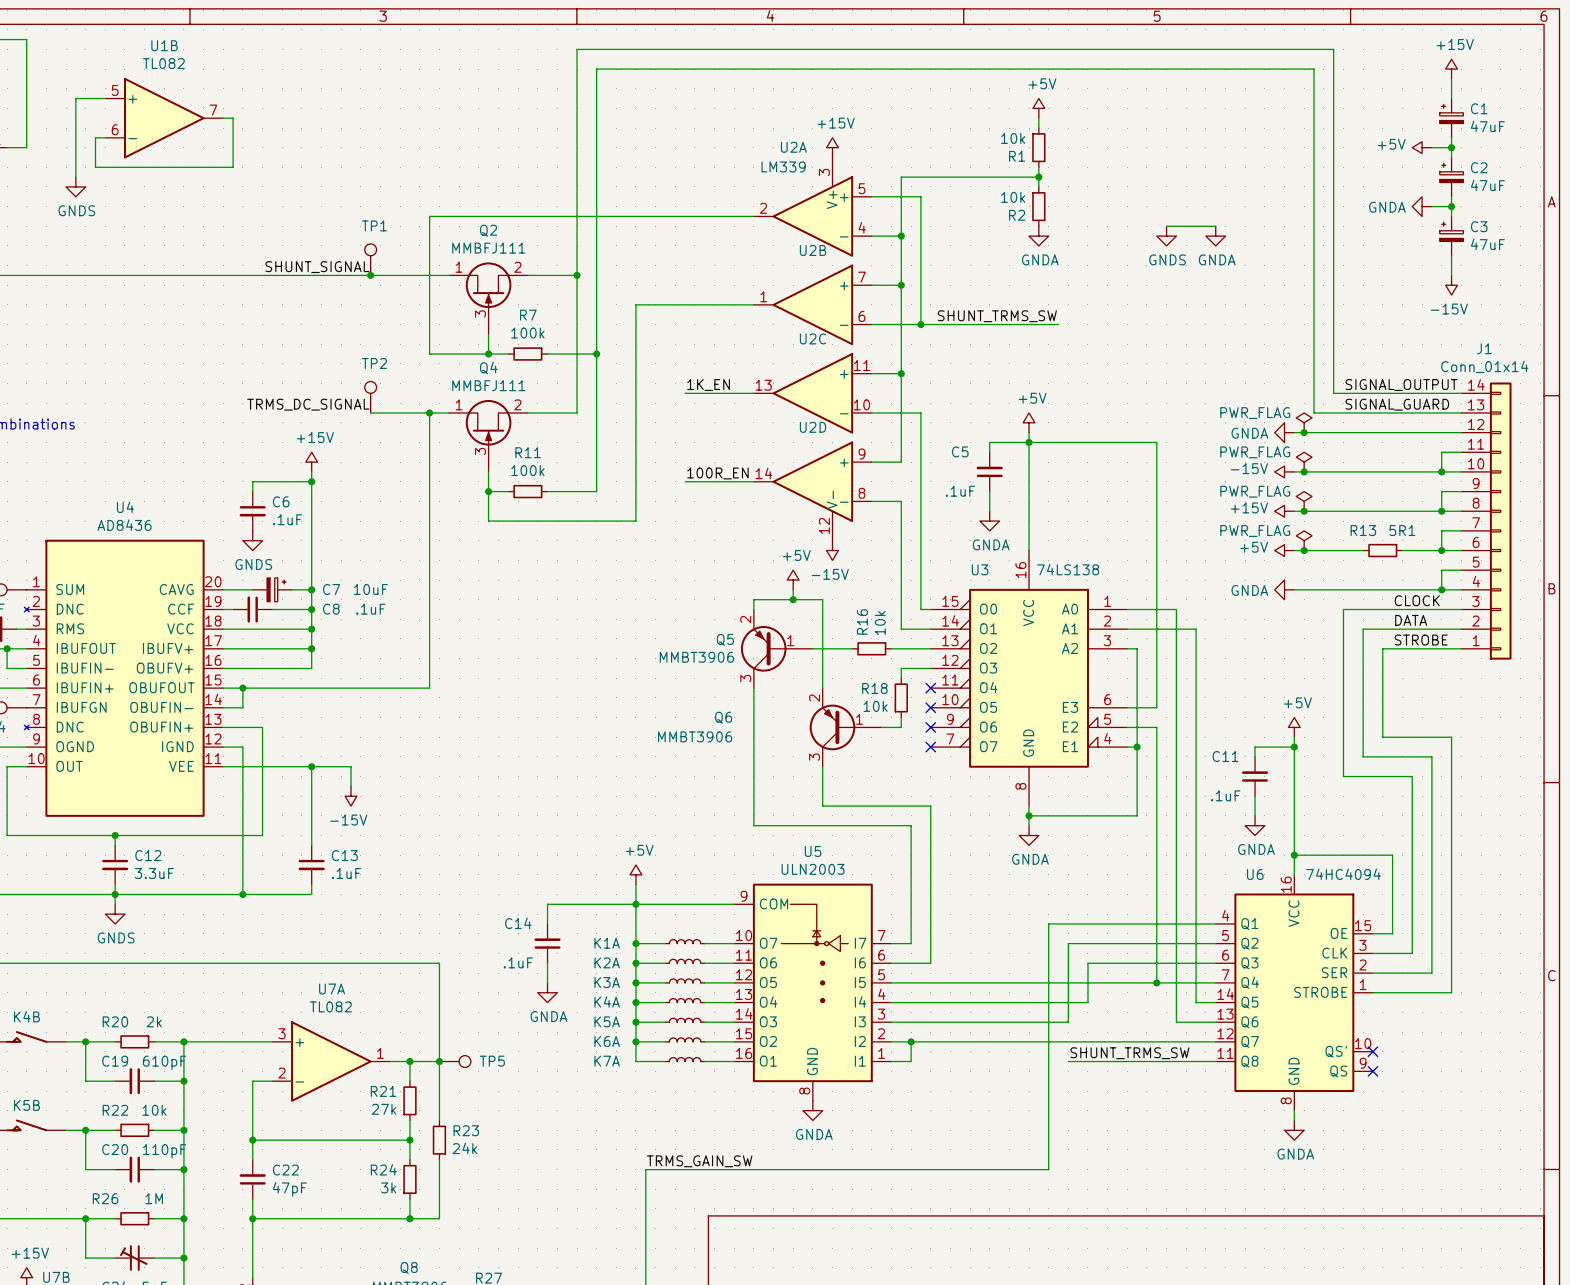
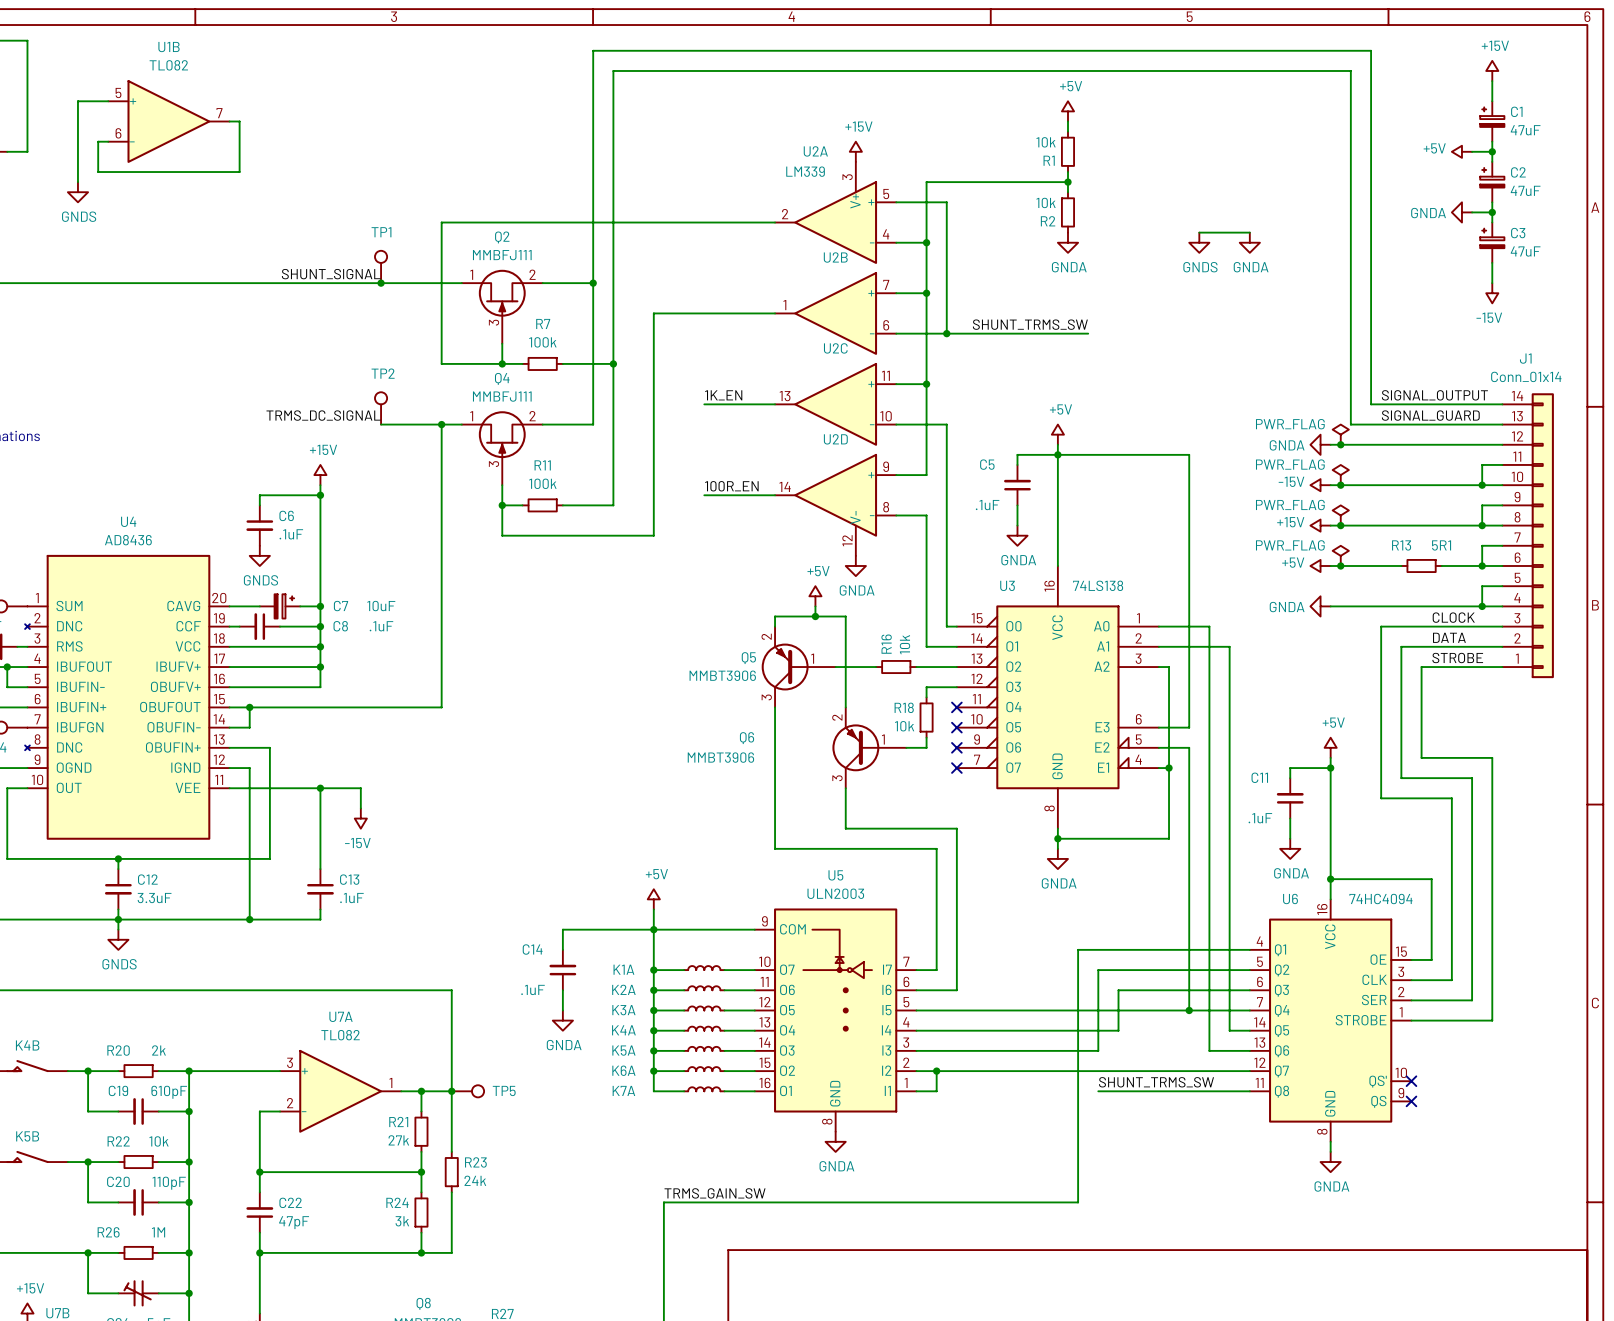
power symbol: -15V (832, 550) -> GNDA (855, 565)

